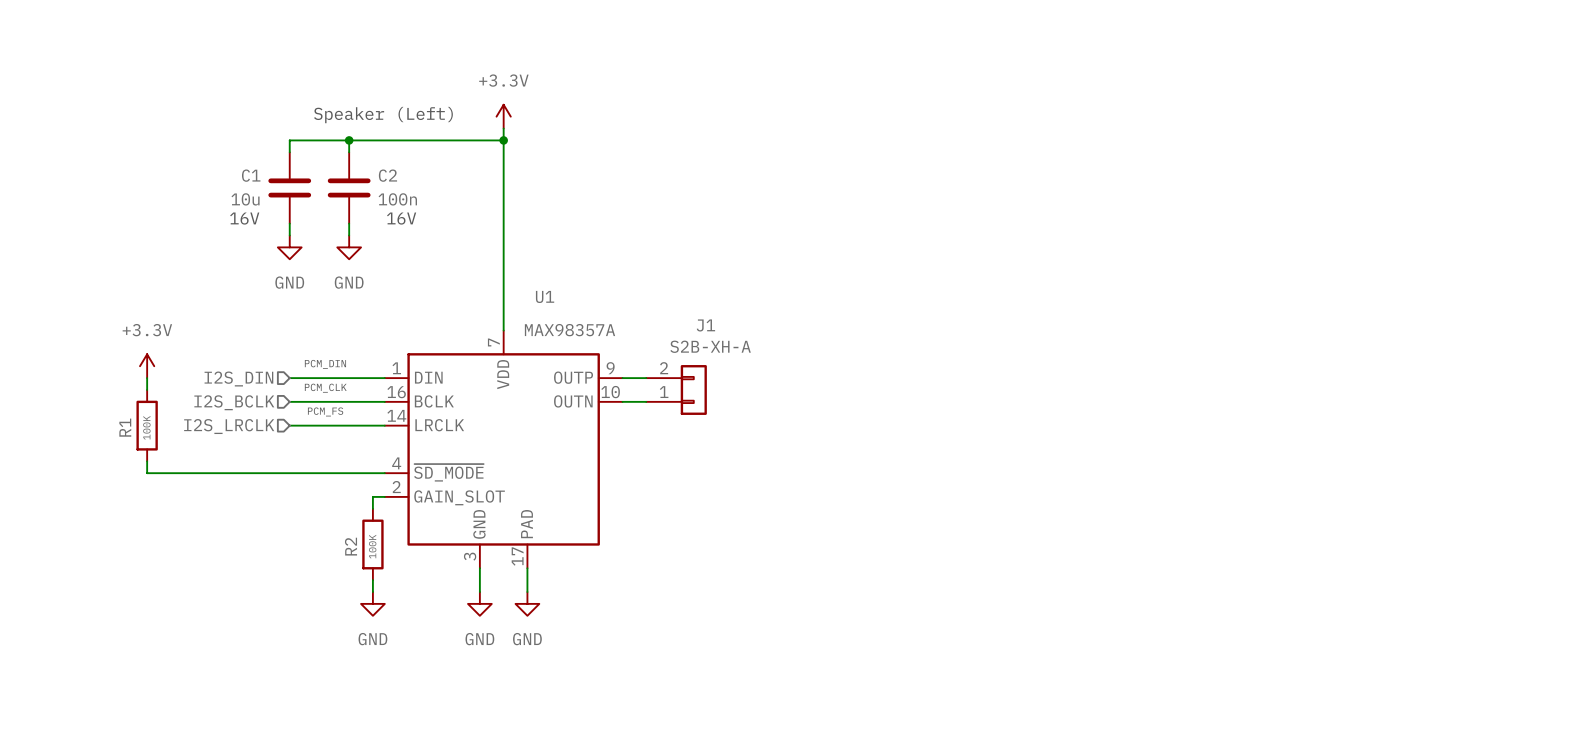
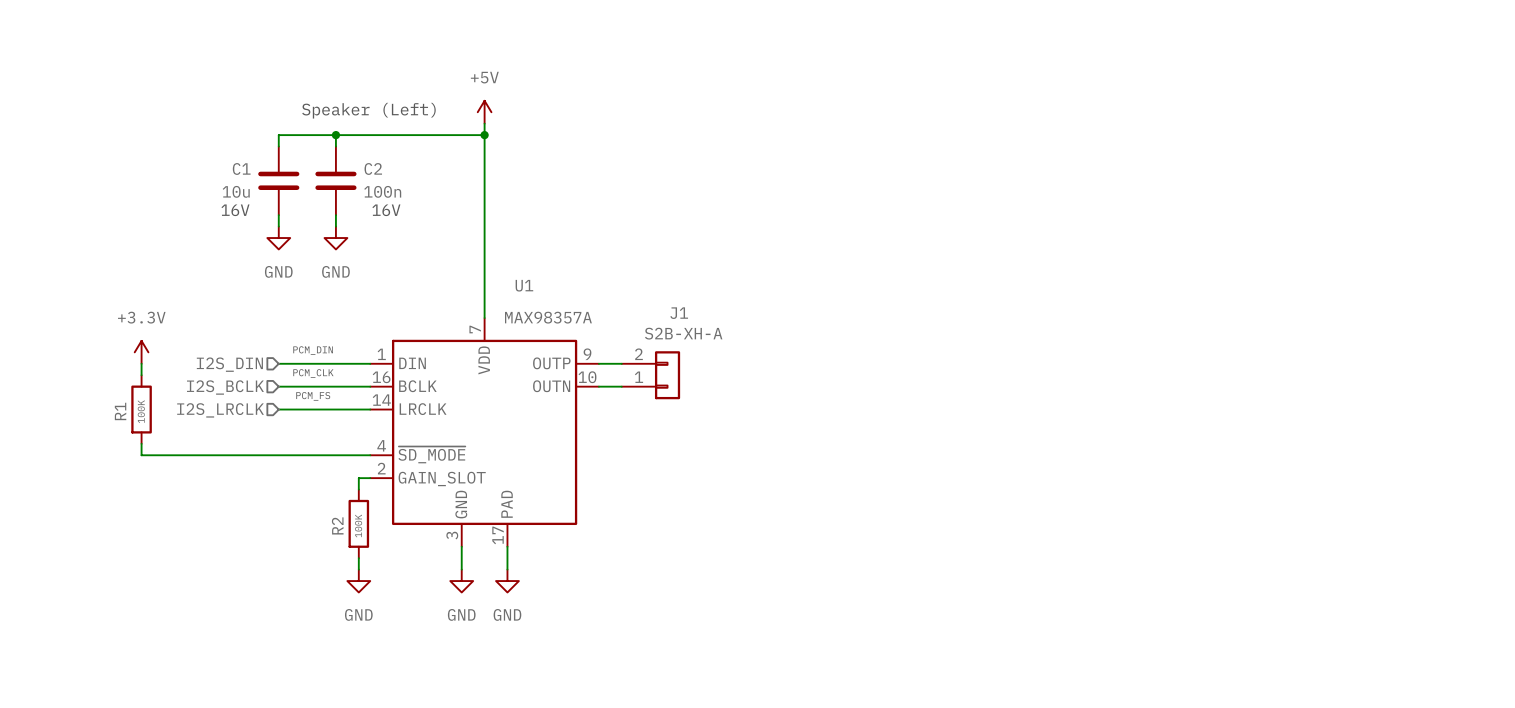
power symbol: +3.3V (503, 116) -> +5V (484, 112)

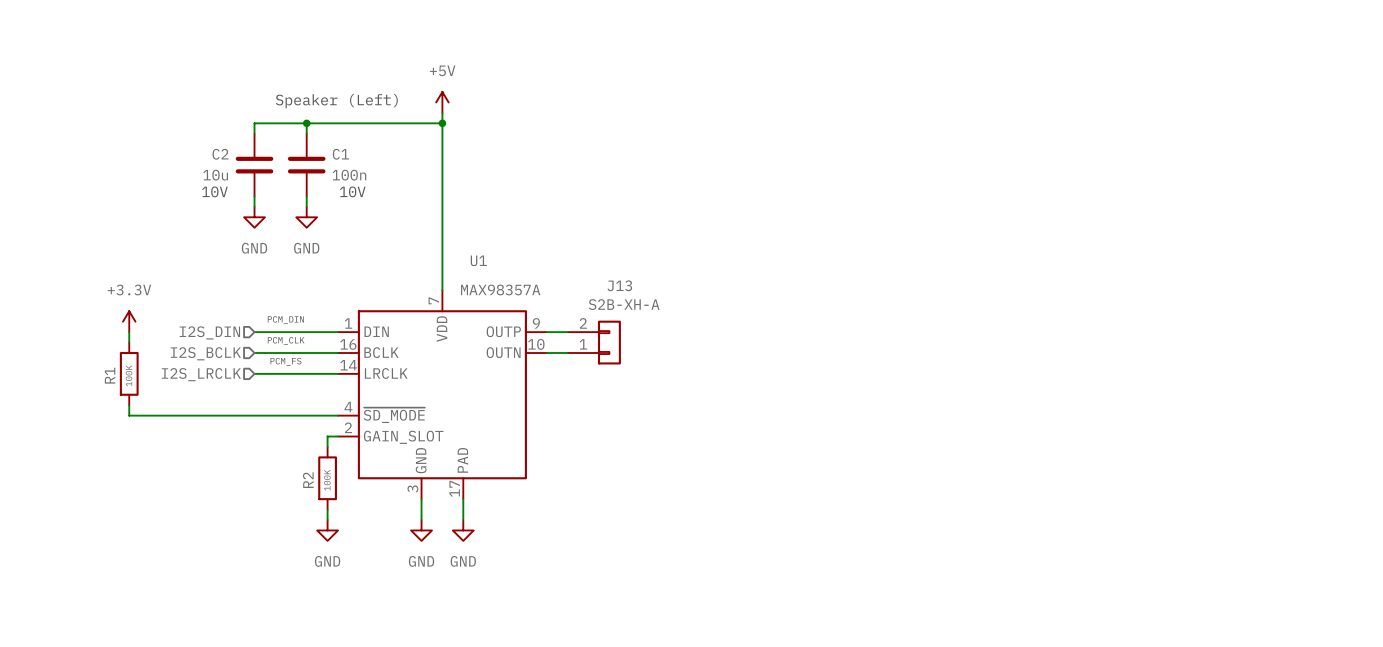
C1 name: C1 (241, 168) -> C2 (220, 154)
C2 name: C2 (373, 168) -> C1 (340, 154)
text: 16V (235, 210) -> 10V (214, 191)
text: 16V (386, 210) -> 10V (352, 191)
J1 name: J1 (679, 313) -> J13 (619, 285)

